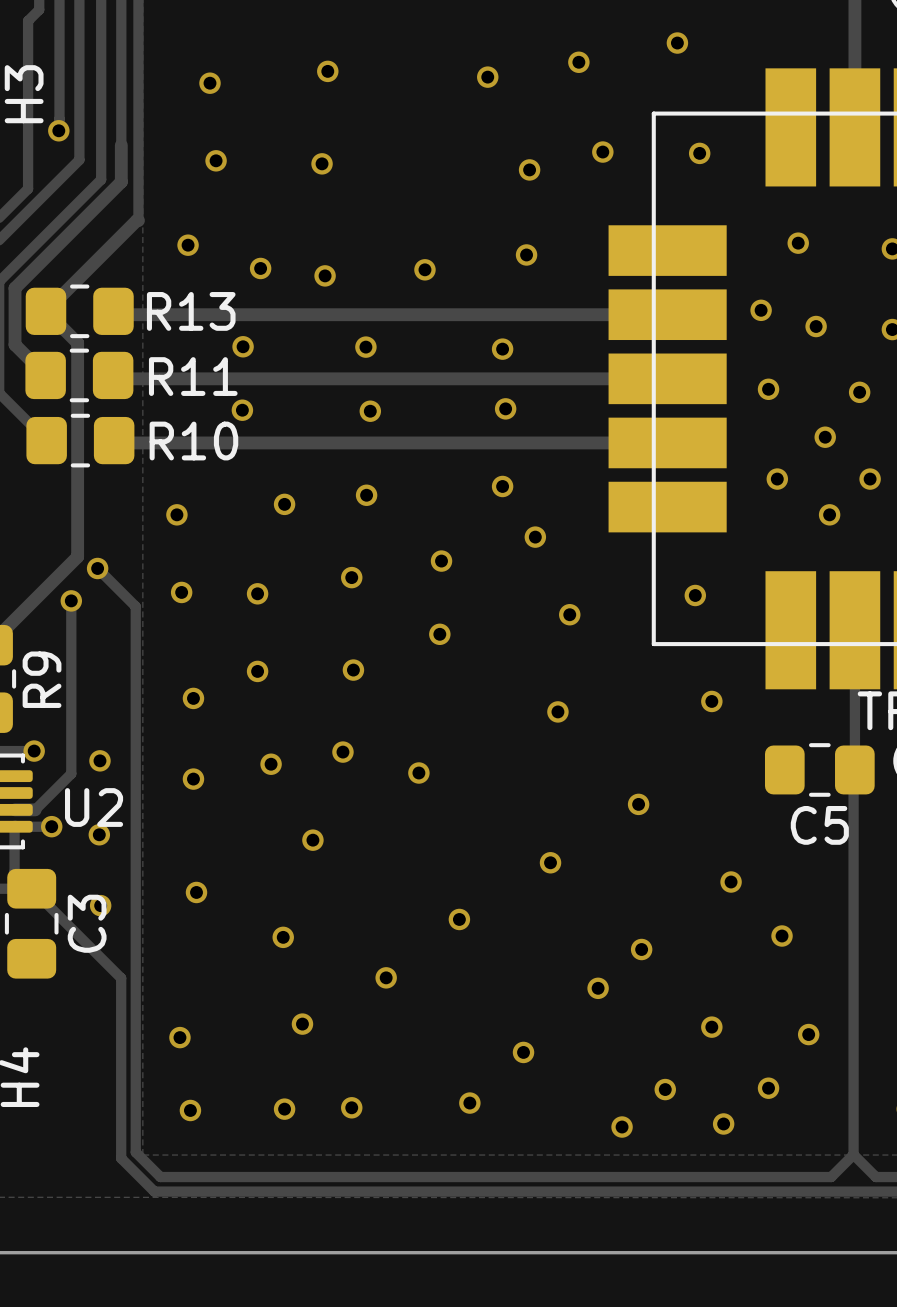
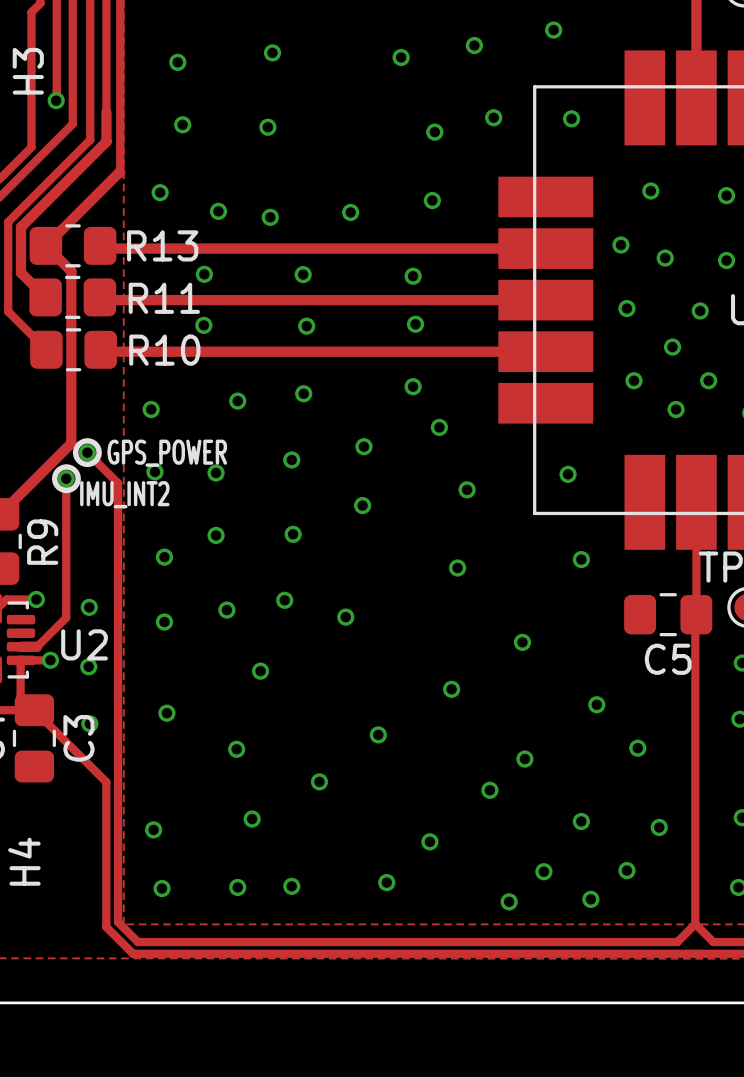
drawing: none -> [52, 438, 102, 494]
text: none -> GPS_POWER (167, 453)
text: none -> IMU_INT2 (124, 494)

